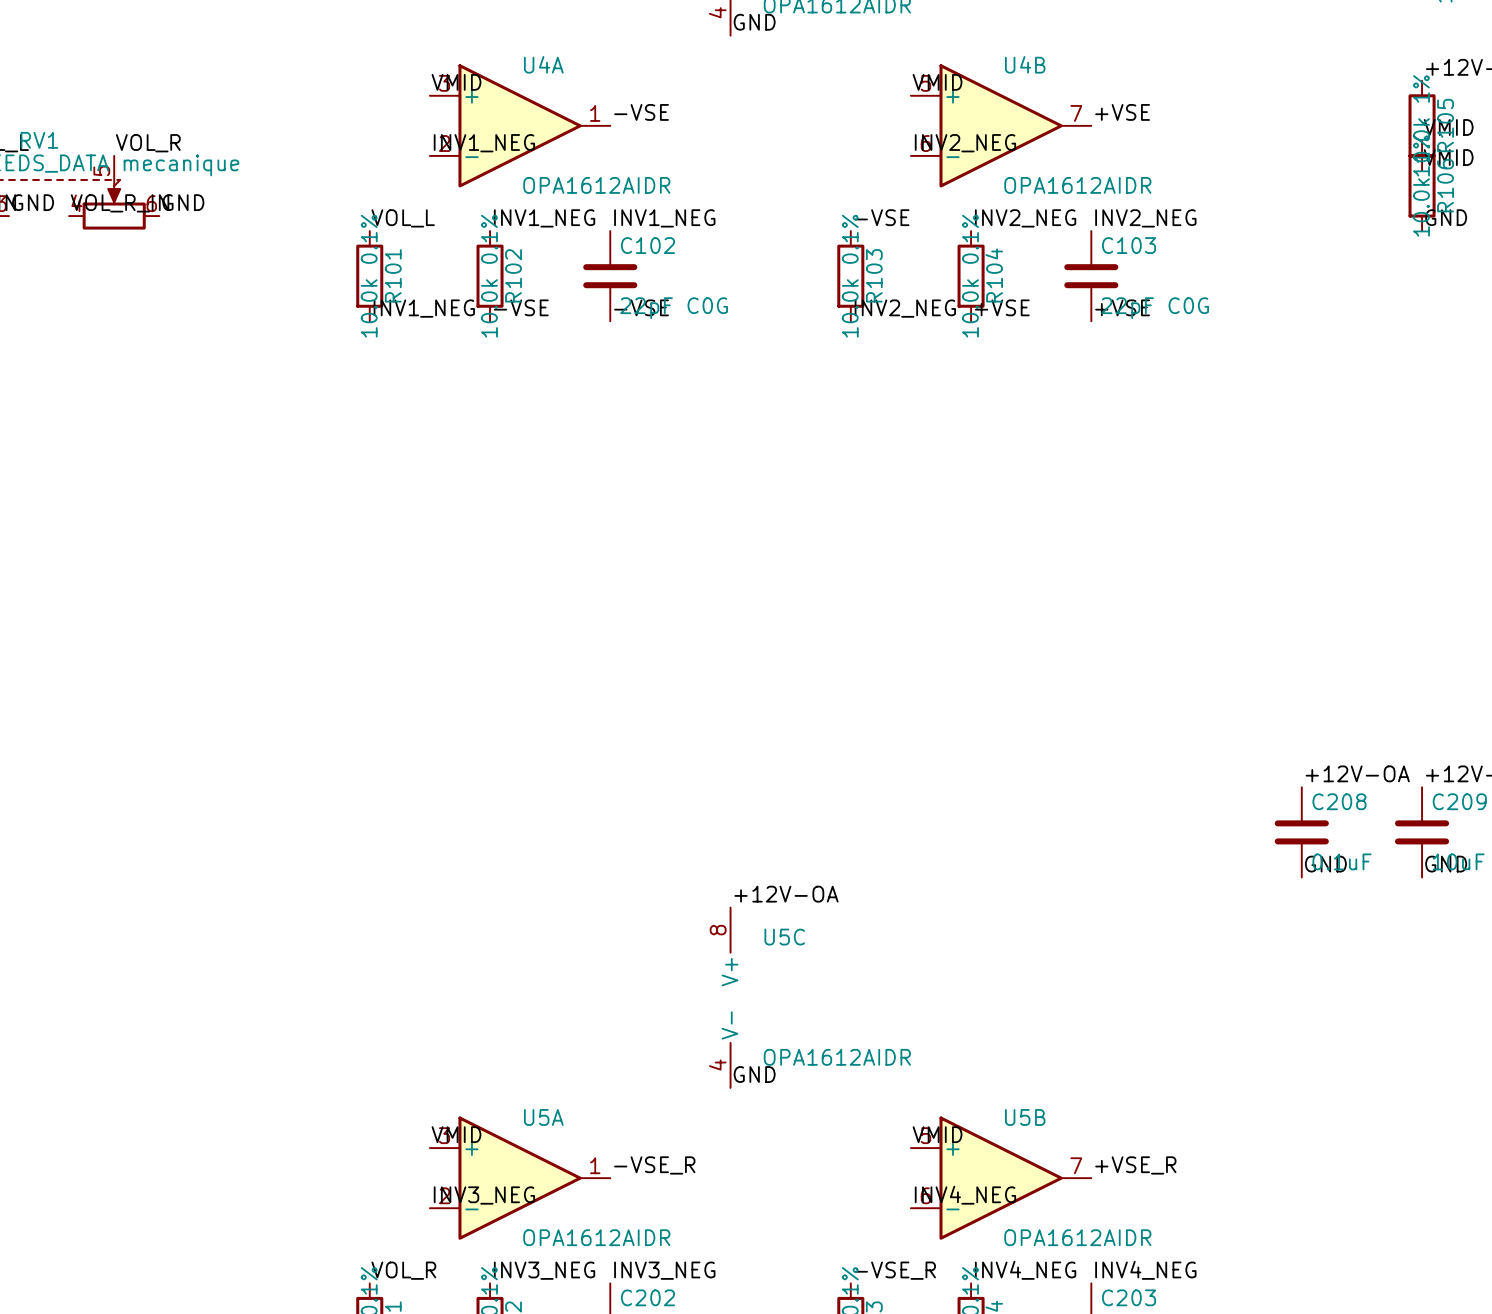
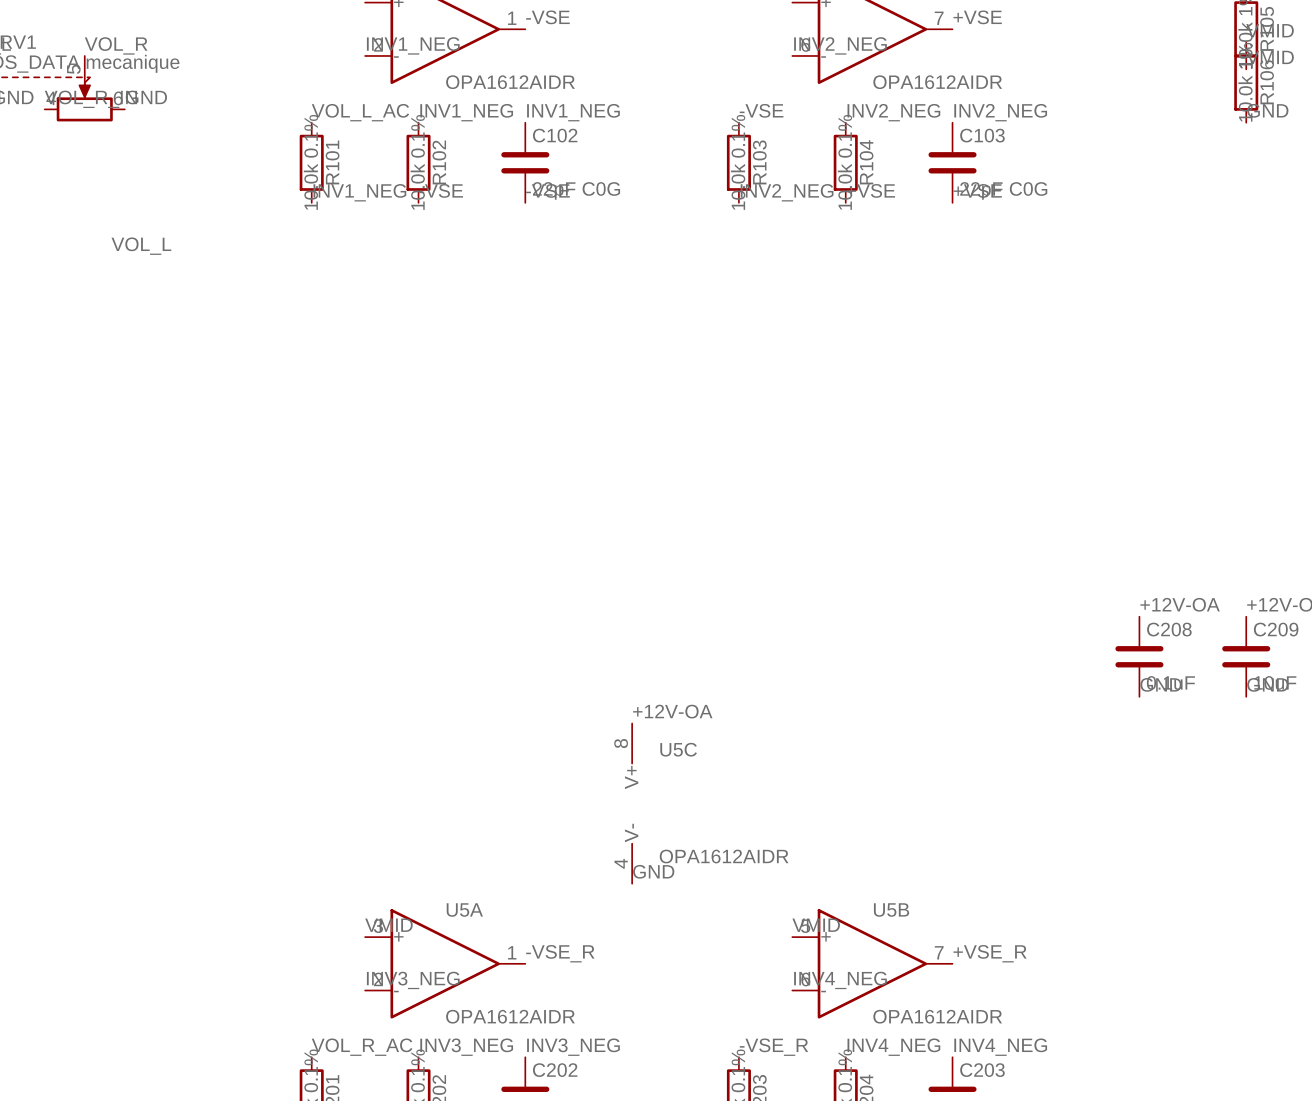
label: VOL_L (403, 218) -> VOL_L_AC (360, 112)
label: none -> VOL_L (141, 246)
label: VOL_R (403, 1270) -> VOL_R_AC (362, 1047)

